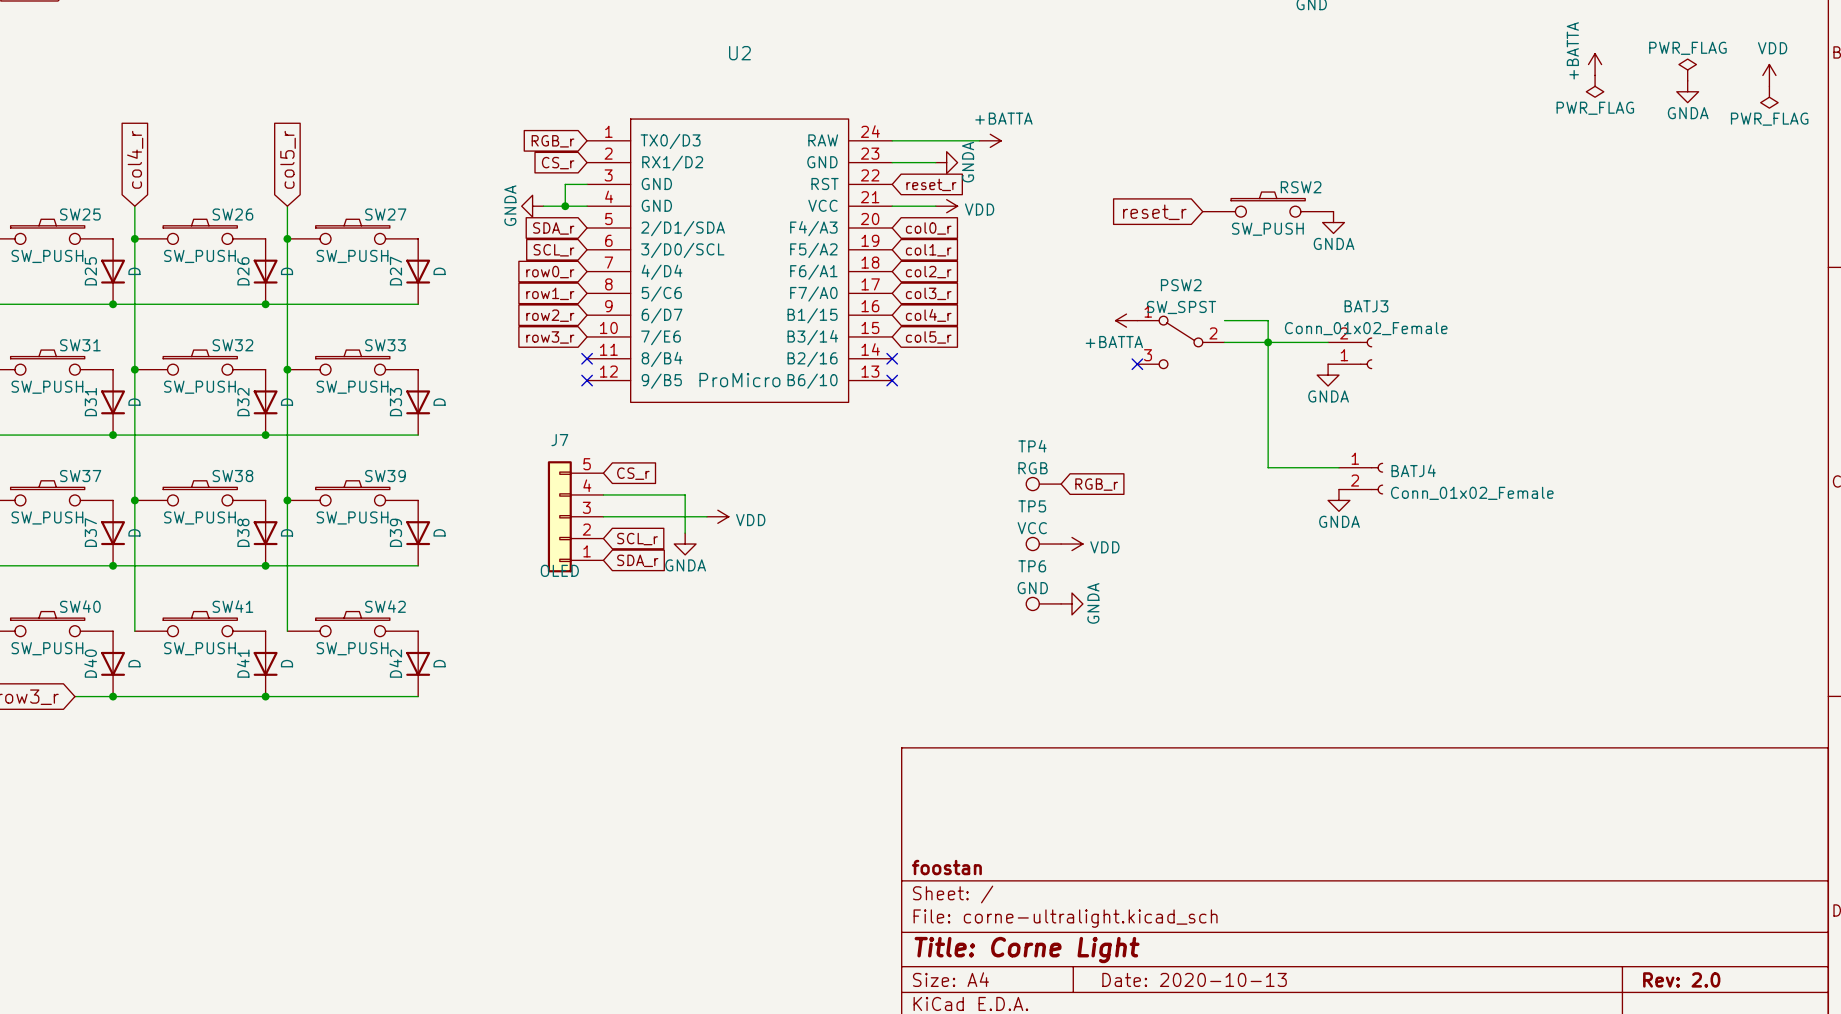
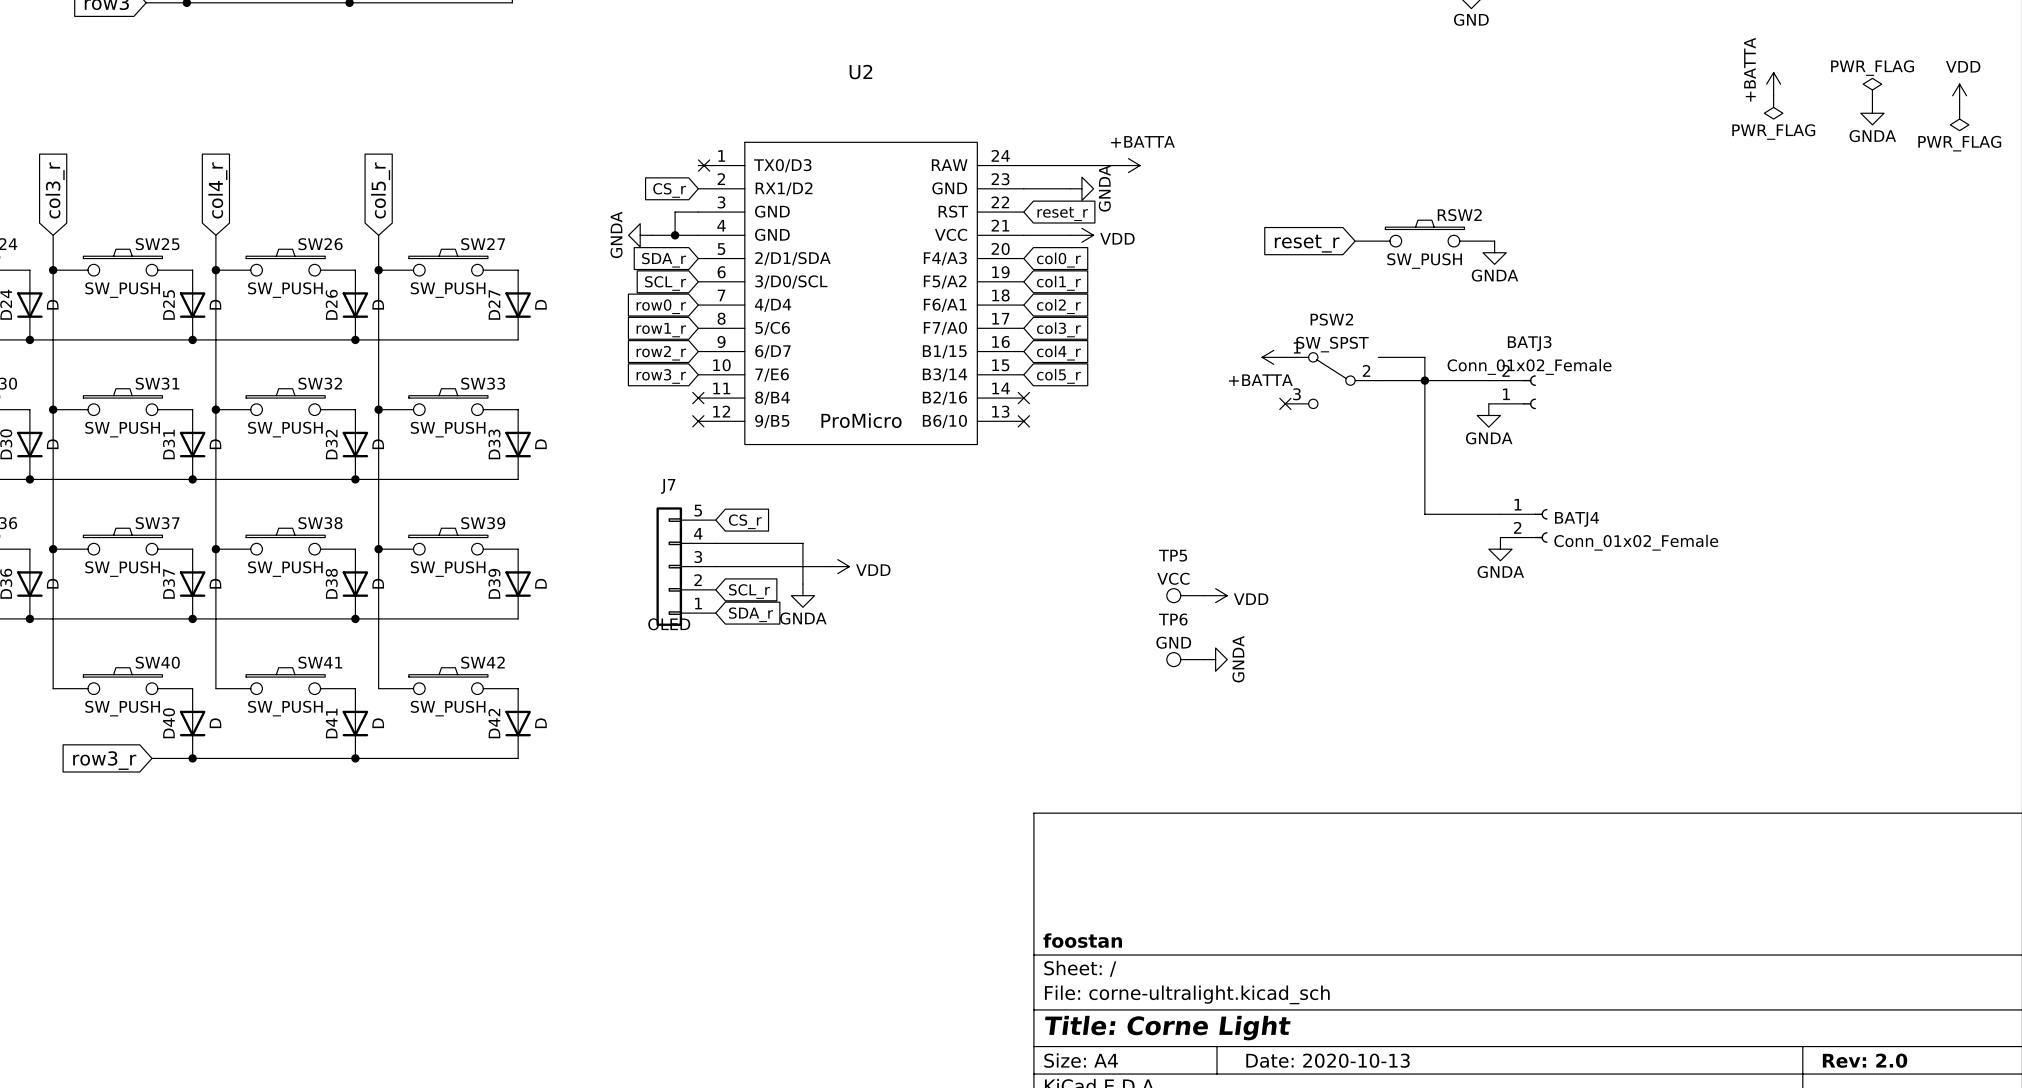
no-connect mark: none -> (704, 165)
global label: RGB_r (552, 141) -> none
TP4: RGB (1043, 484) -> none
global label: RGB_r (1096, 484) -> none

